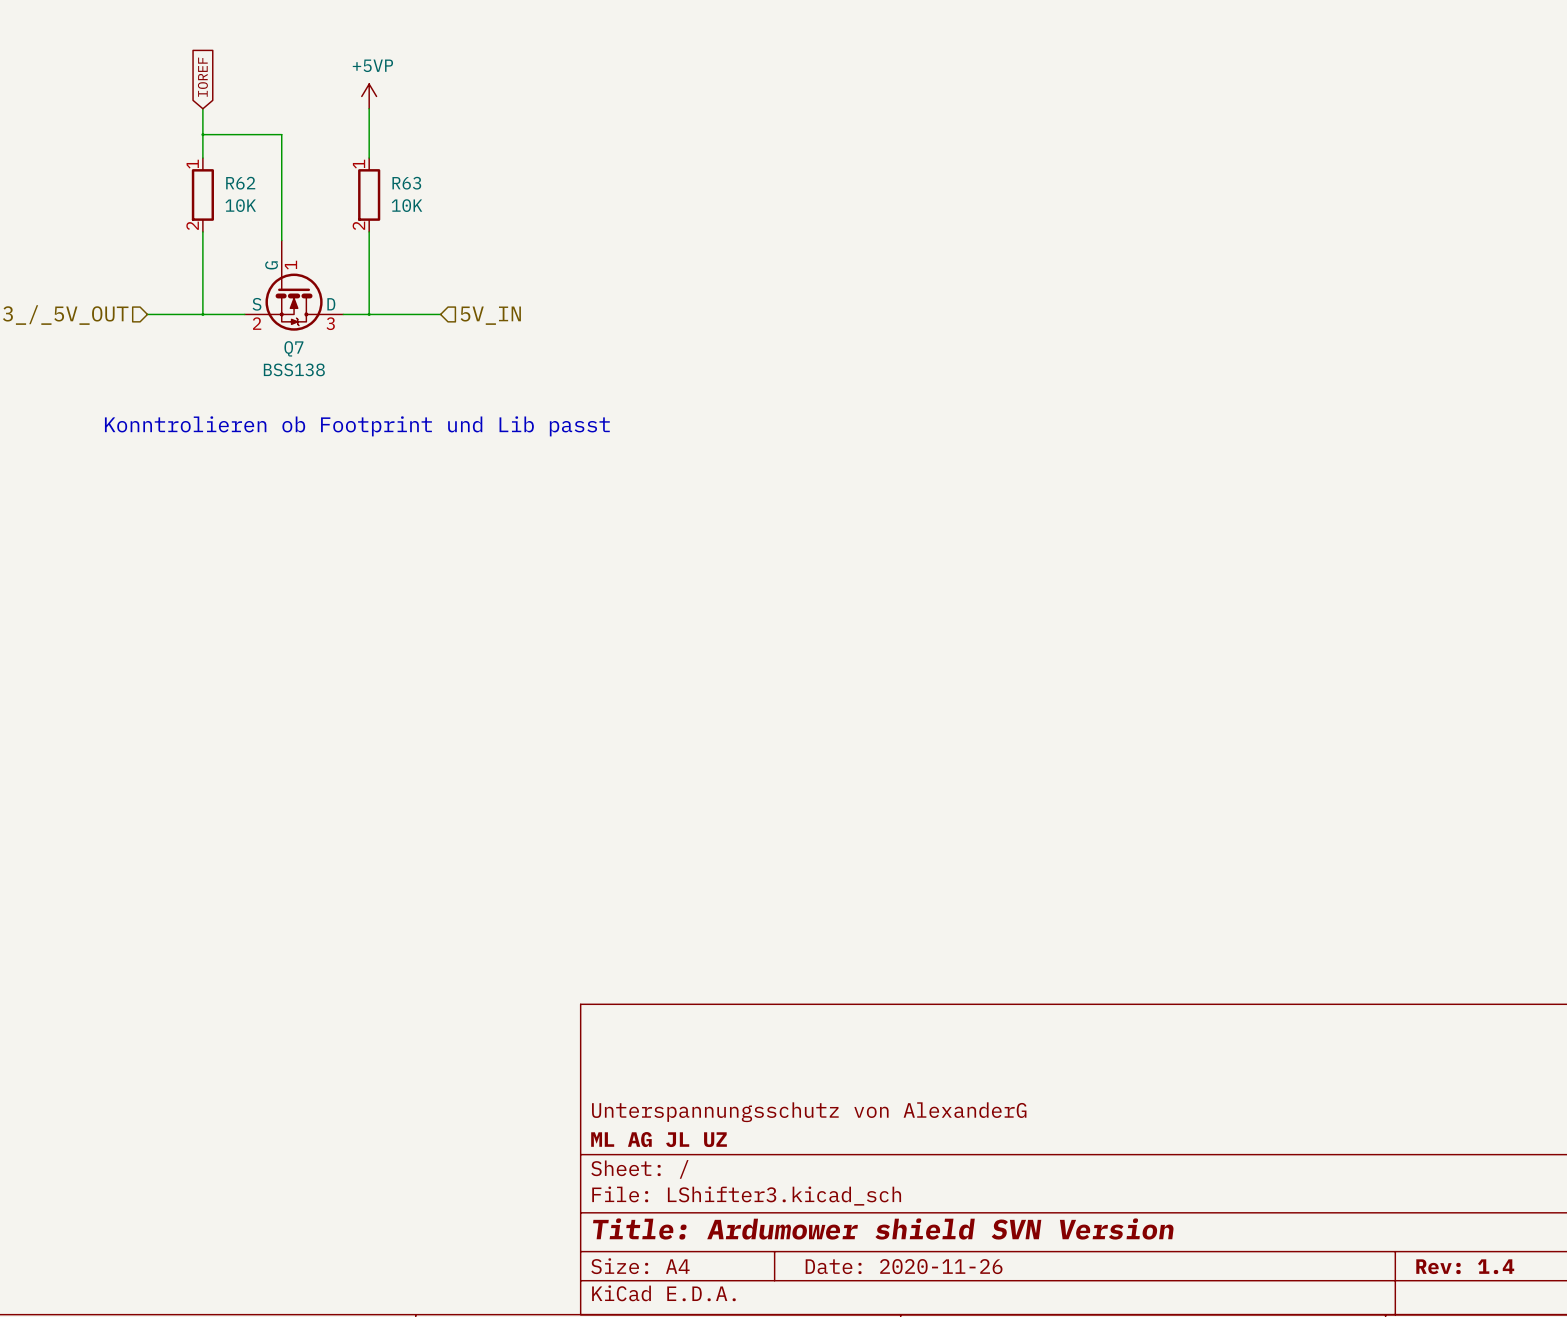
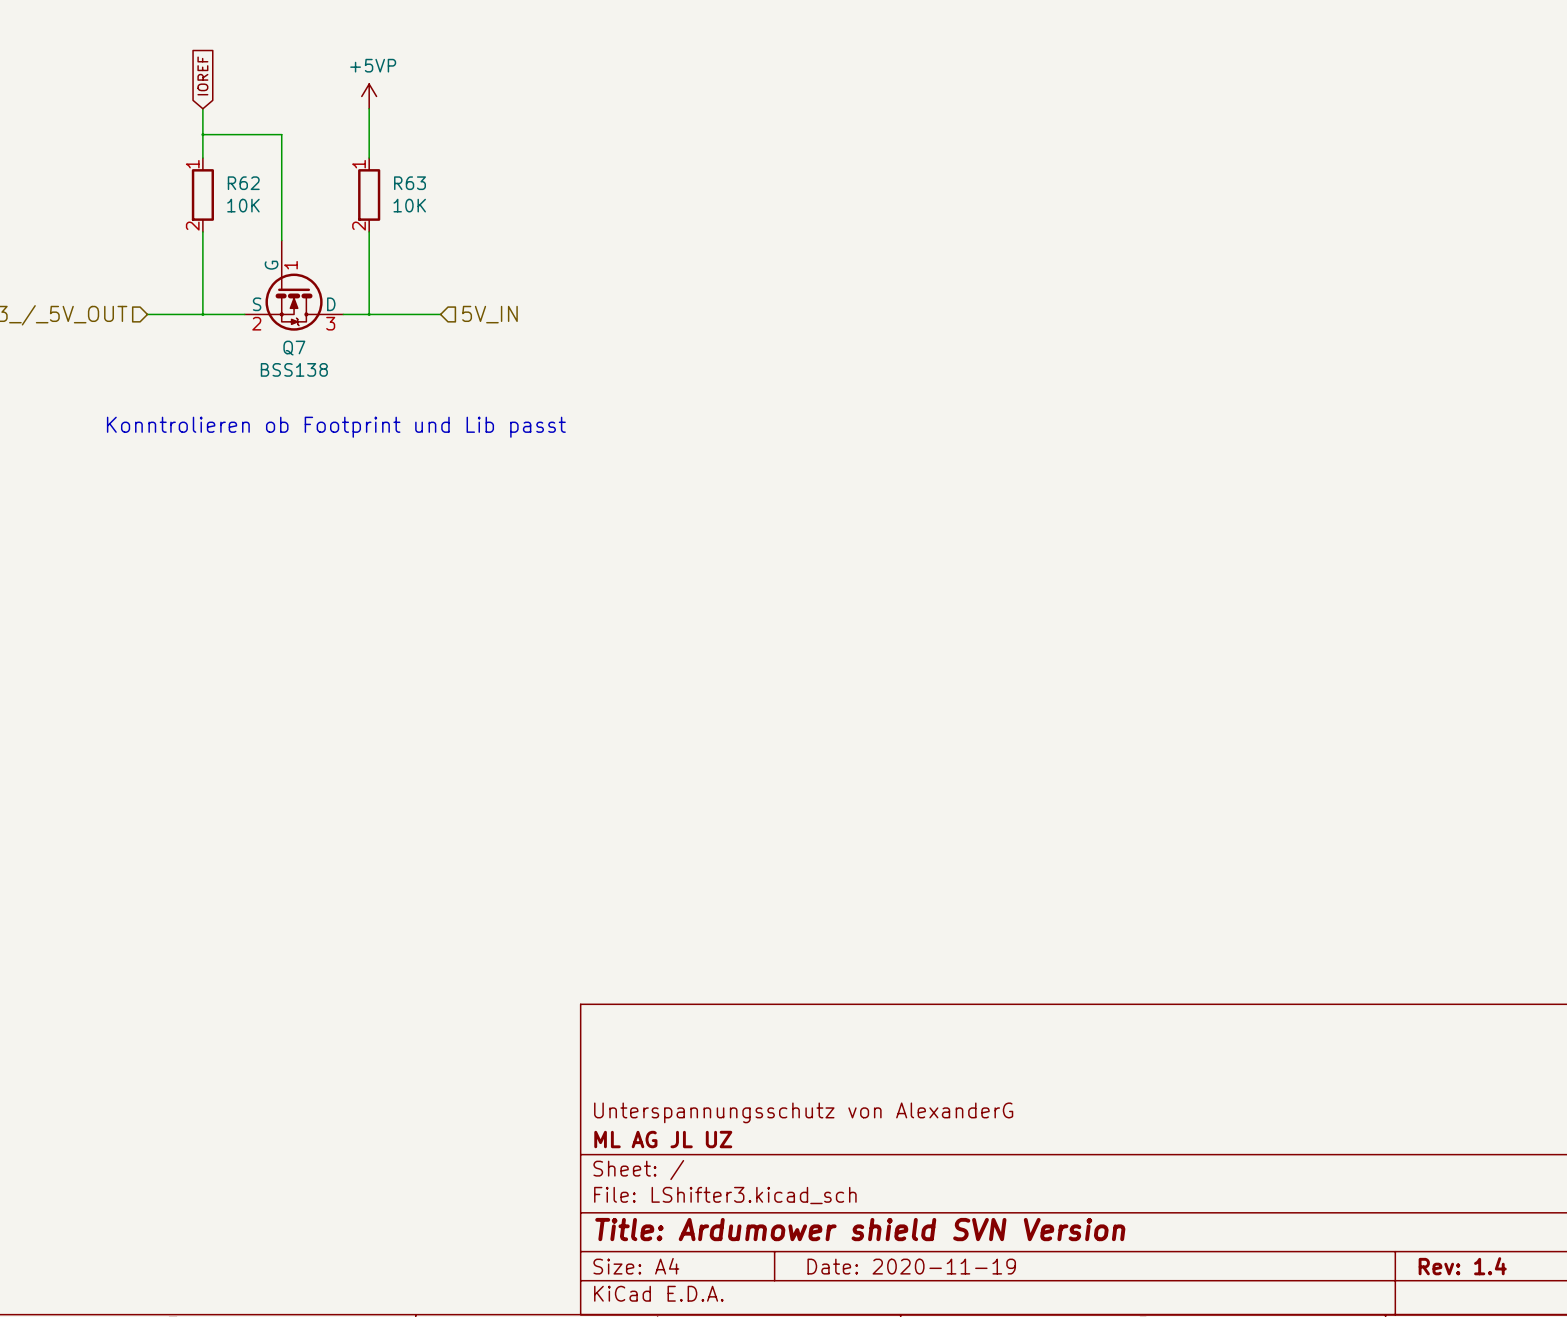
title block: Date: 2020-11-26 (904, 1266) -> Date: 2020-11-19 (911, 1266)

